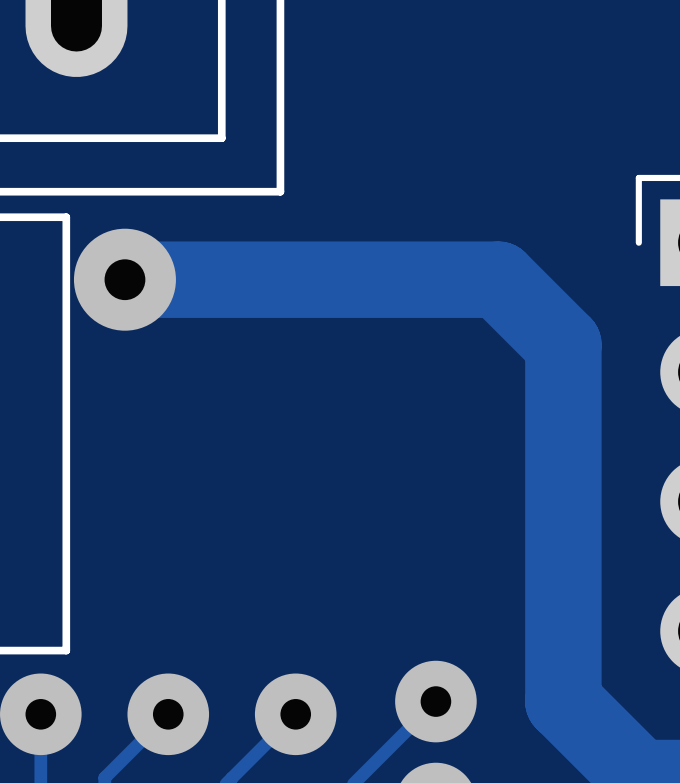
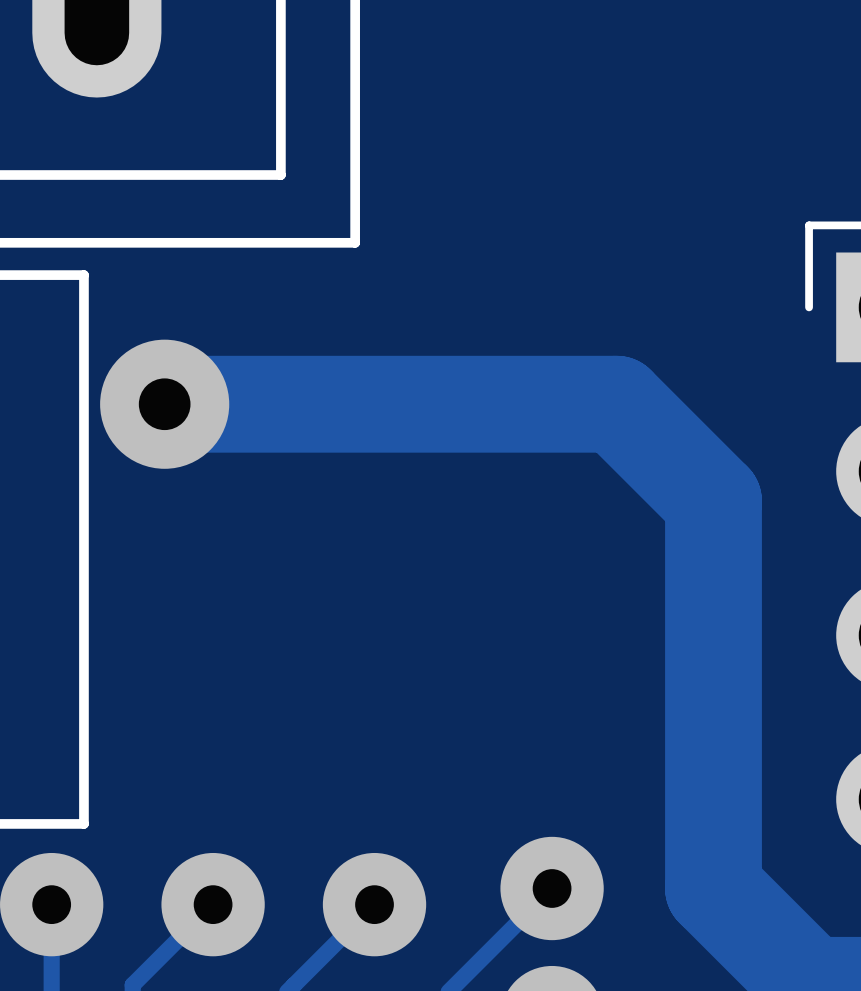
track: (124, 279) (498, 279) (563, 344) (563, 395) -> (164, 404) (616, 404) (713, 501)
via position: (124, 279) -> (164, 404)

